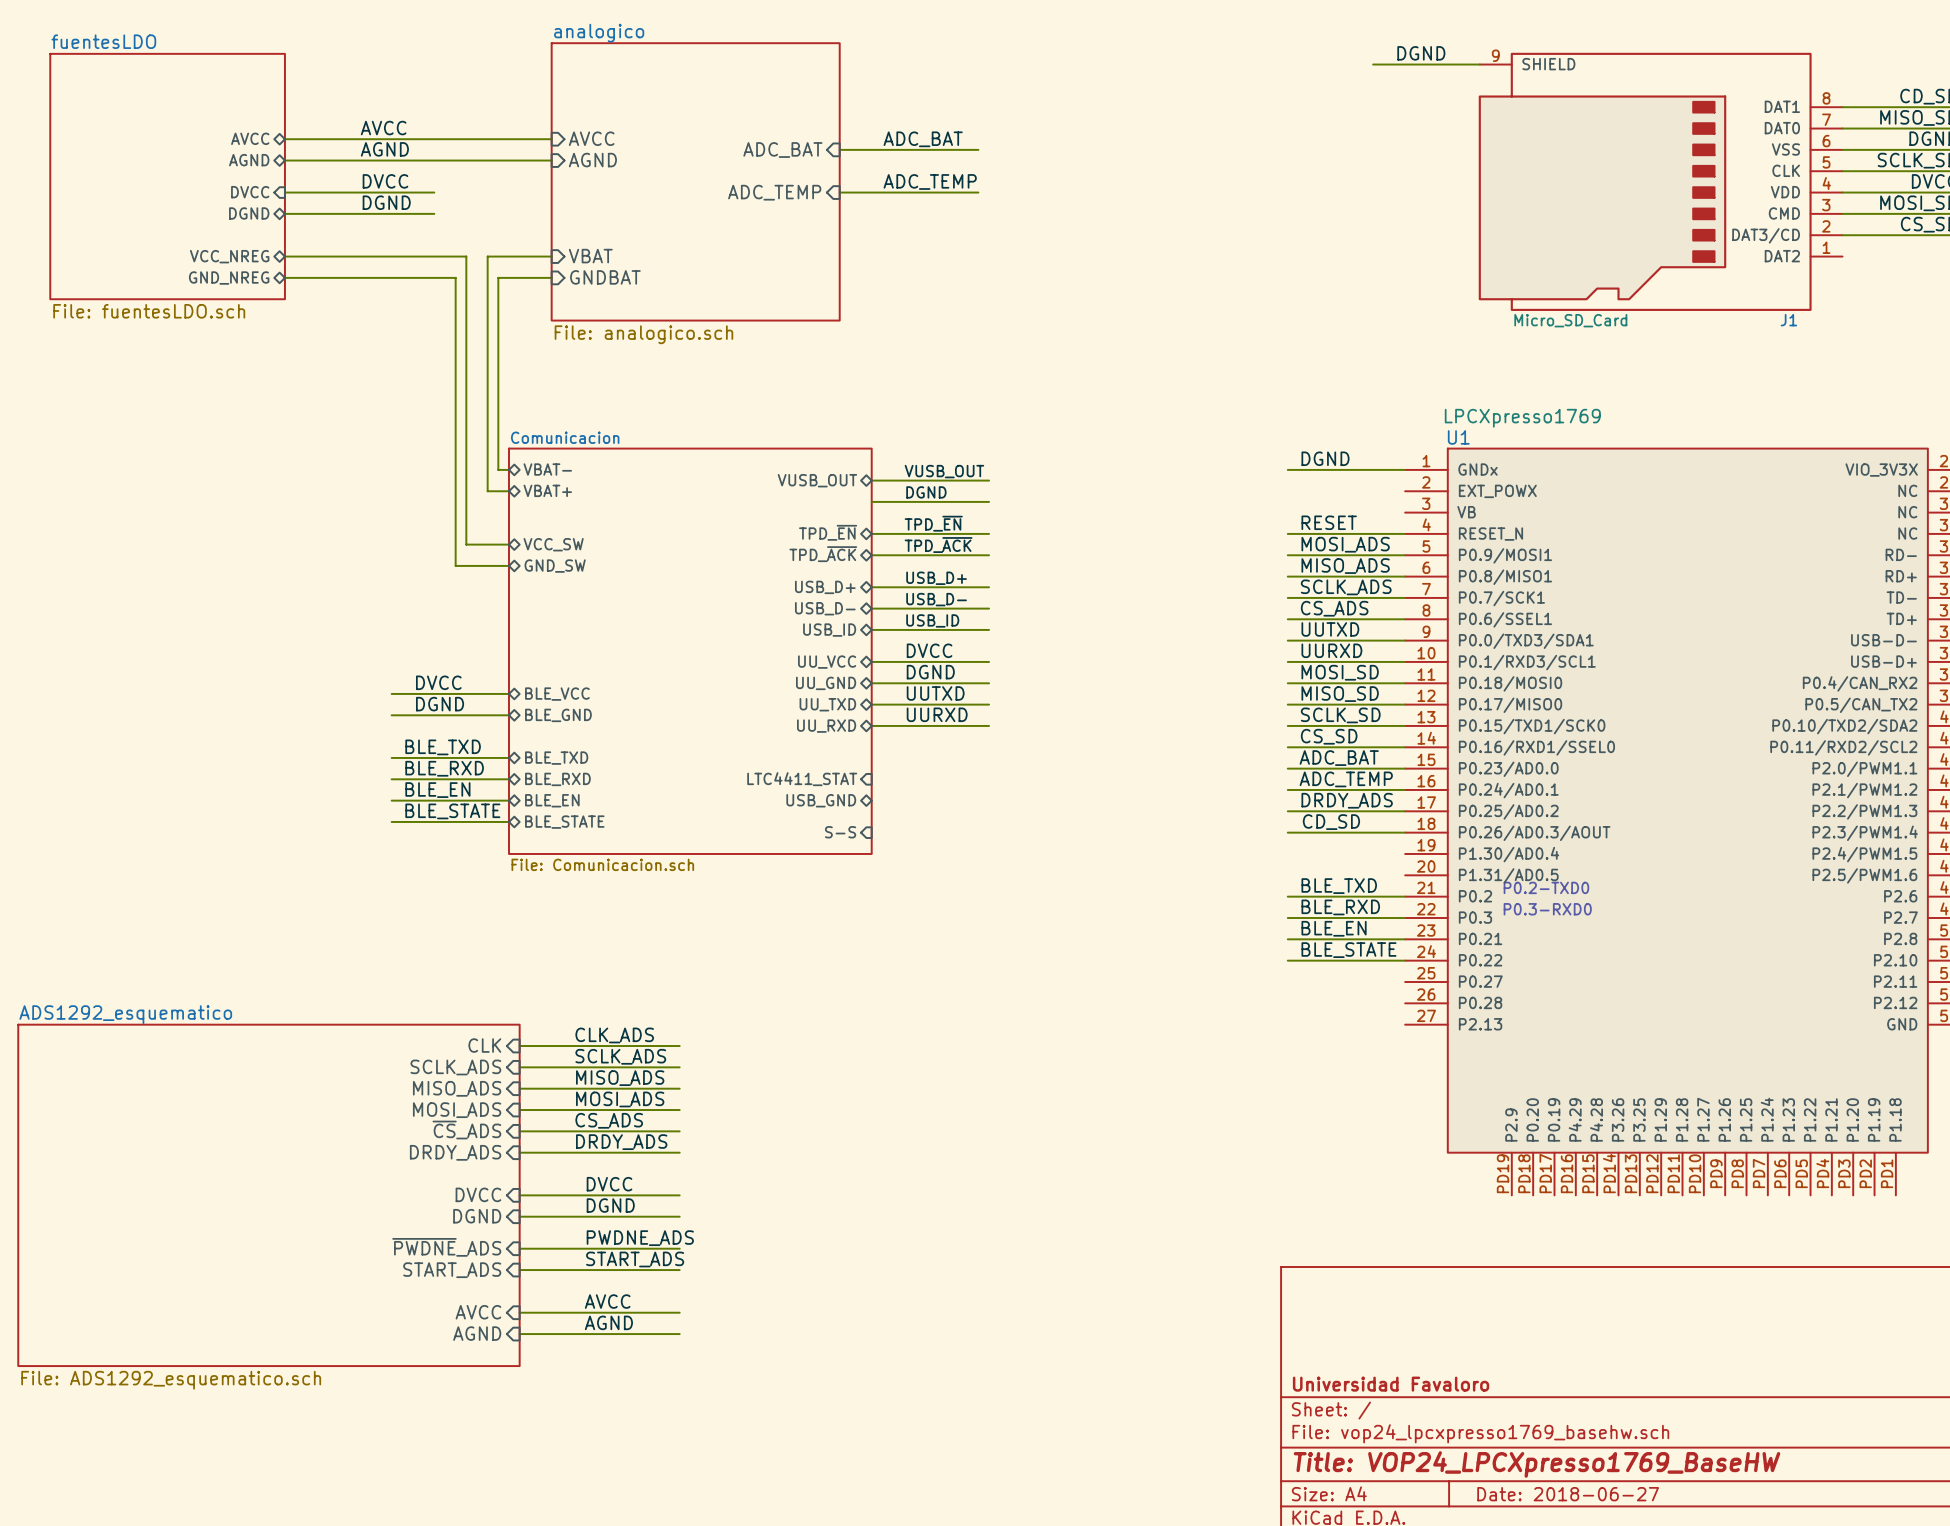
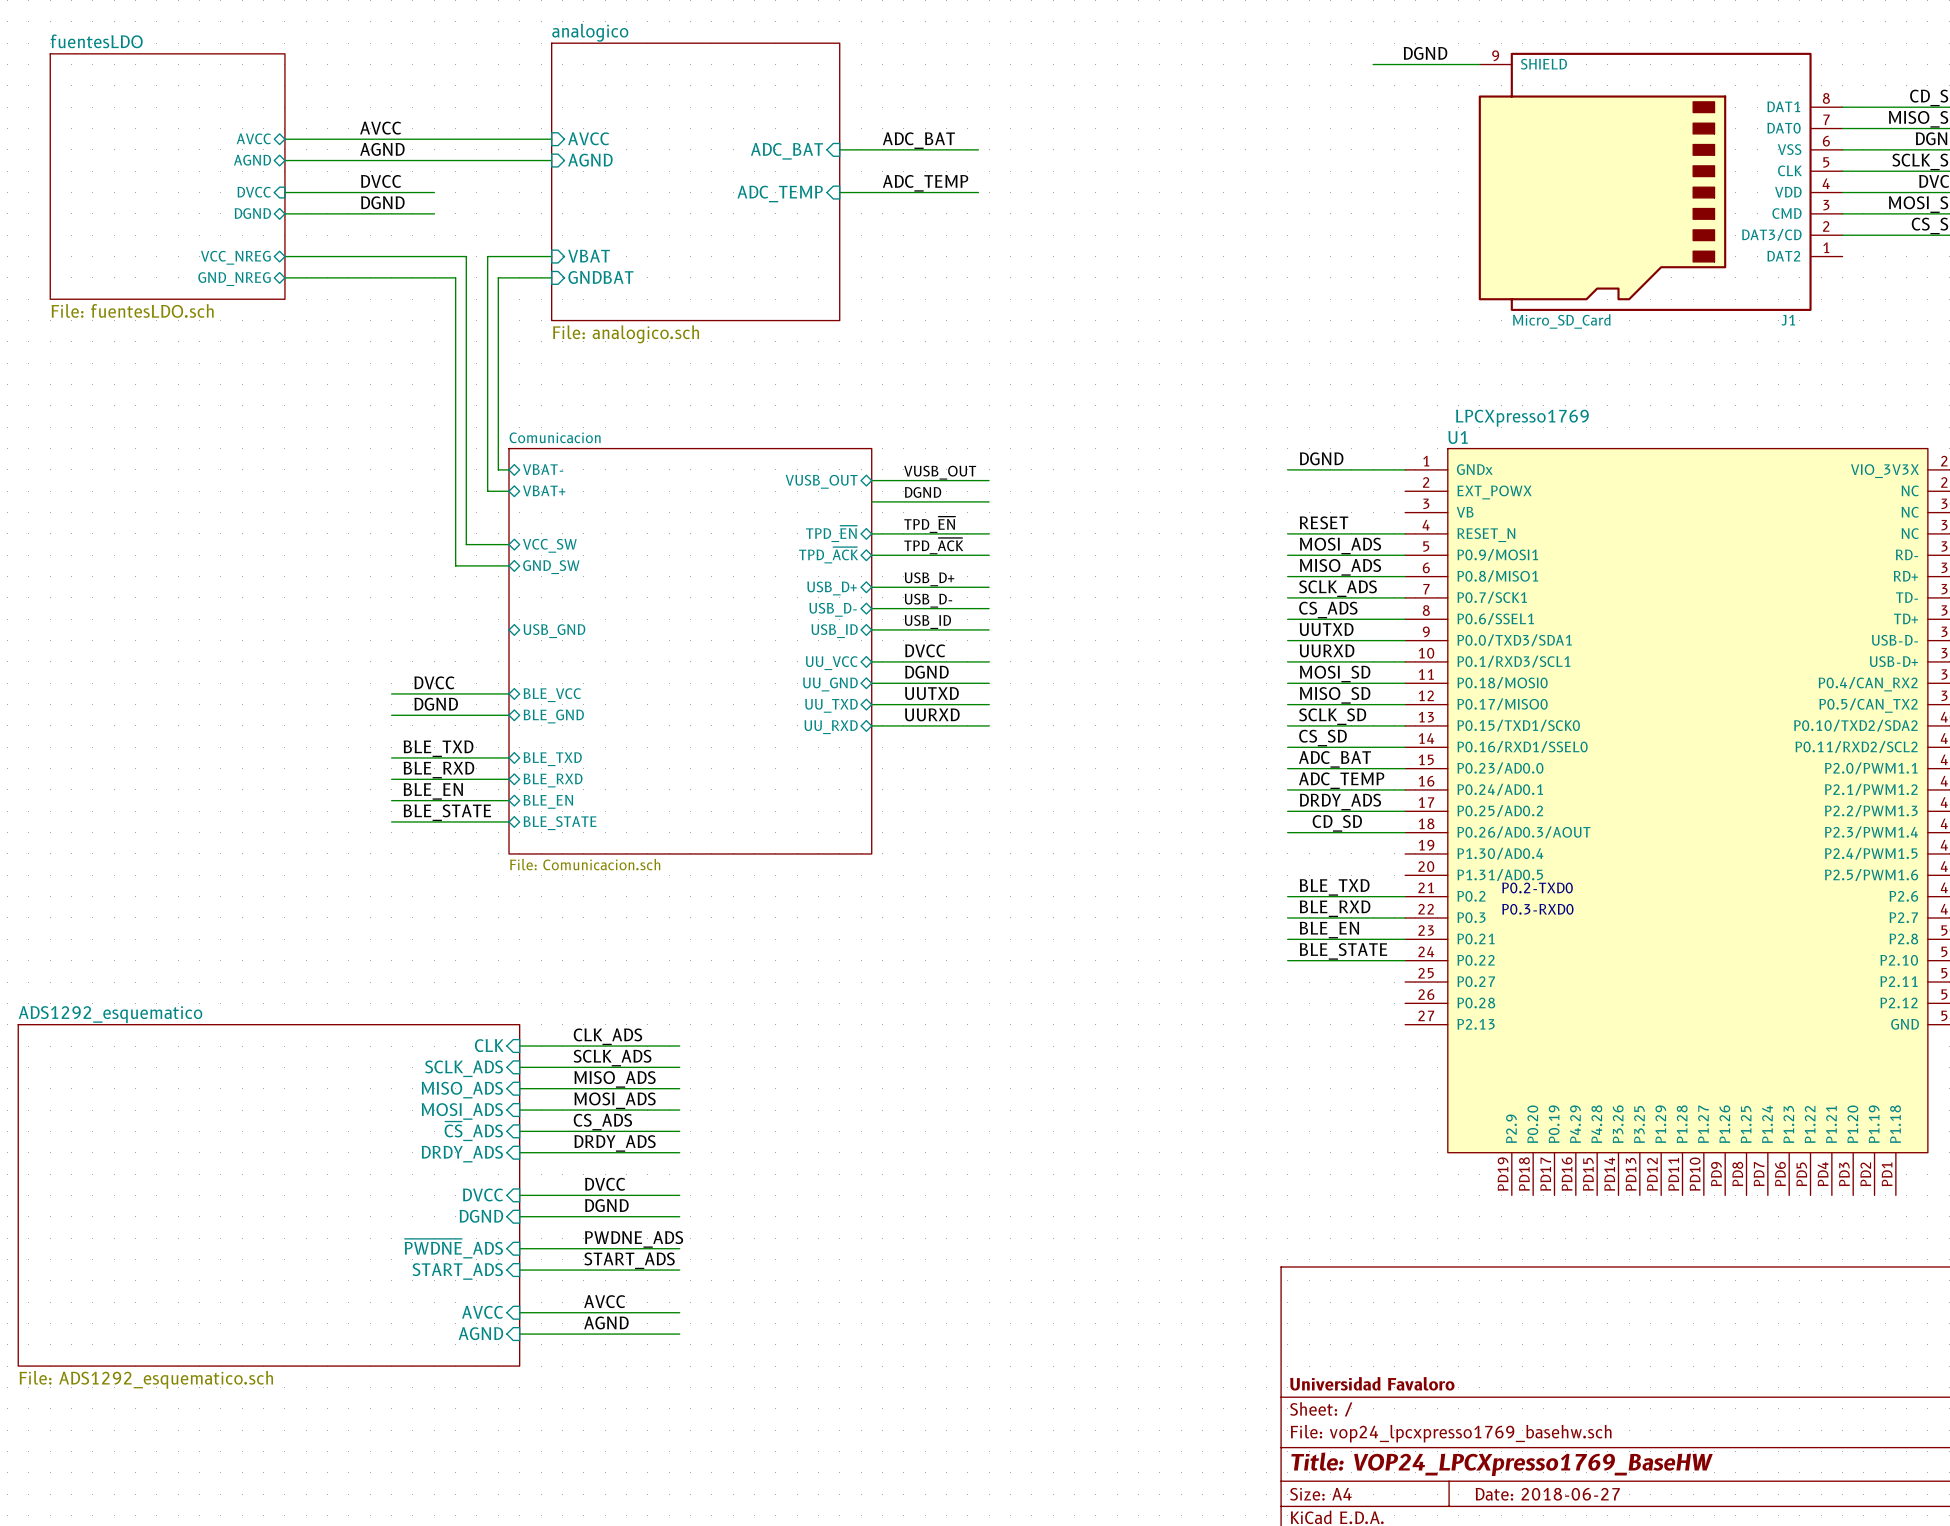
sheet pin: none -> USB_GND (554, 631)
sheet pin: LTC4411_STAT (802, 779) -> none
sheet pin: USB_GND (821, 800) -> none
sheet pin: S-S (840, 832) -> none

